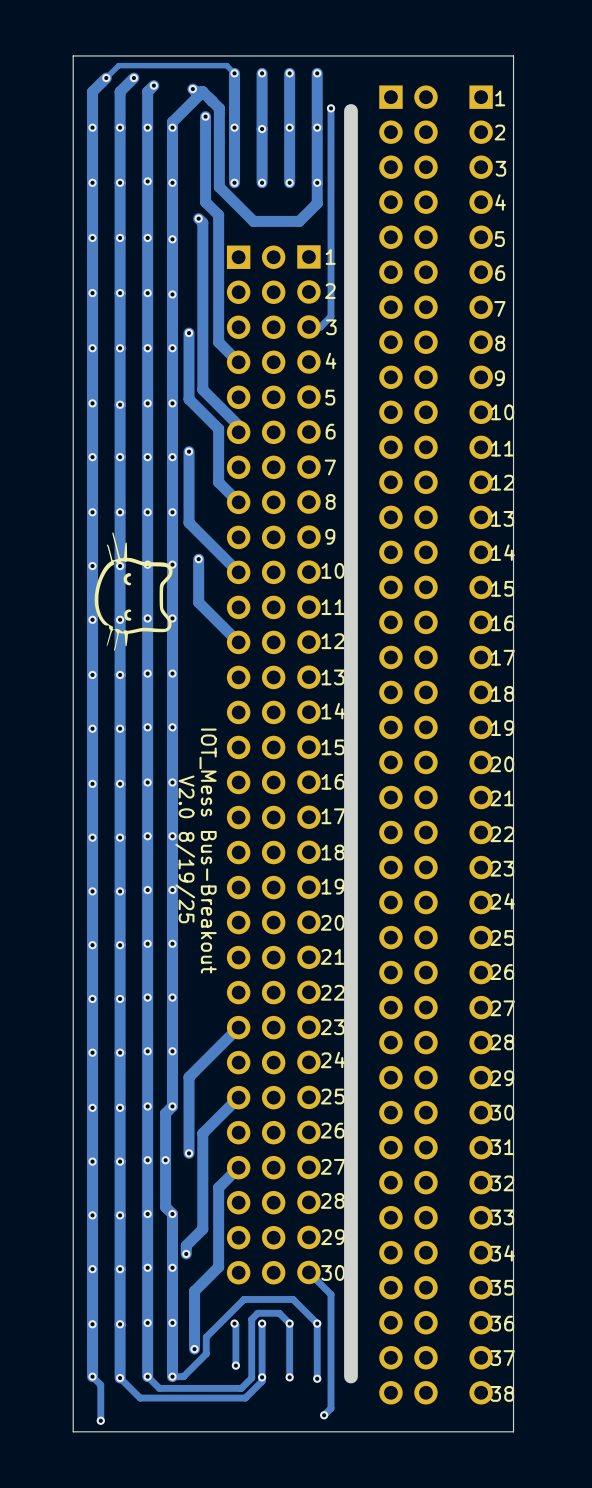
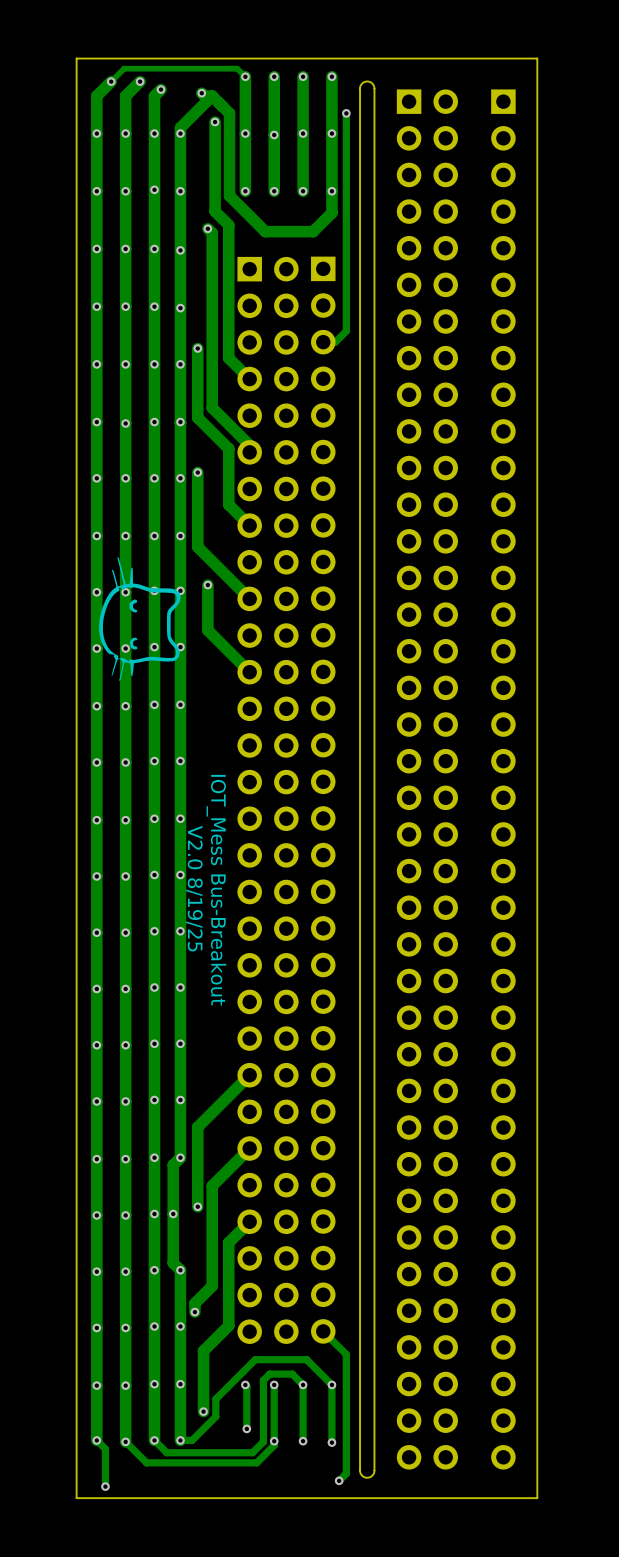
board edge: none -> (374, 88) (374, 1470) (372, 1475) (367, 1477) (362, 1475) (360, 1470) (360, 88) (362, 83) (367, 81) (372, 83) (374, 88)
text: 1 (500, 98) -> none
board edge: (350, 110) (350, 1376) -> none
text: 2 (499, 132) -> none
text: 3 (500, 168) -> none
text: 4 (500, 202) -> none
text: 5 (499, 239) -> none
text: 1 (330, 256) -> none
text: 6 (500, 273) -> none
text: 2 (330, 291) -> none
text: 7 (499, 308) -> none
text: 3 (331, 327) -> none
text: 8 (500, 343) -> none
text: 4 (331, 361) -> none
text: 9 (499, 378) -> none
text: 5 (330, 397) -> none
text: 10 (502, 412) -> none
text: 6 (330, 431) -> none
text: 11 (502, 448) -> none
text: 7 (330, 467) -> none
text: 12 (502, 482) -> none
text: 8 (330, 501) -> none
text: 13 (502, 518) -> none
text: 9 (330, 536) -> none
text: 14 (502, 552) -> none
text: 10 (333, 570) -> none
text: 15 (502, 588) -> none
text: 11 (333, 607) -> none
text: 16 (502, 623) -> none
text: 12 (333, 641) -> none
text: 17 (502, 657) -> none
text: 13 (333, 677) -> none
text: 18 (502, 693) -> none
text: 14 (333, 711) -> none
text: 19 (502, 728) -> none
text: 15 (333, 747) -> none
text: 20 (502, 764) -> none
text: 16 (333, 781) -> none
text: 21 (502, 798) -> none
text: 17 (333, 816) -> none
text: 22 (502, 834) -> none
text: 18 (333, 852) -> none
text: 23 (502, 868) -> none
text: 19 (333, 886) -> none
text: 24 (502, 901) -> none
text: 20 (332, 922) -> none
text: 25 (502, 937) -> none
text: 21 (332, 956) -> none
text: 26 (502, 972) -> none
text: 22 (332, 992) -> none
text: 27 (502, 1008) -> none
text: 23 (332, 1027) -> none
text: 28 (502, 1042) -> none
text: 24 (333, 1059) -> none
text: 29 (502, 1078) -> none
text: 25 (332, 1096) -> none
text: 30 (502, 1112) -> none
text: 26 (332, 1130) -> none
text: 31 (502, 1147) -> none
text: 27 (333, 1166) -> none
text: 32 (502, 1183) -> none
text: 28 (332, 1200) -> none
text: 33 (502, 1217) -> none
text: 29 (333, 1237) -> none
text: 34 (502, 1253) -> none
text: 30 (333, 1273) -> none
text: 35 (502, 1287) -> none
text: 36 (502, 1323) -> none
text: 37 (502, 1358) -> none
text: 38 (502, 1393) -> none

